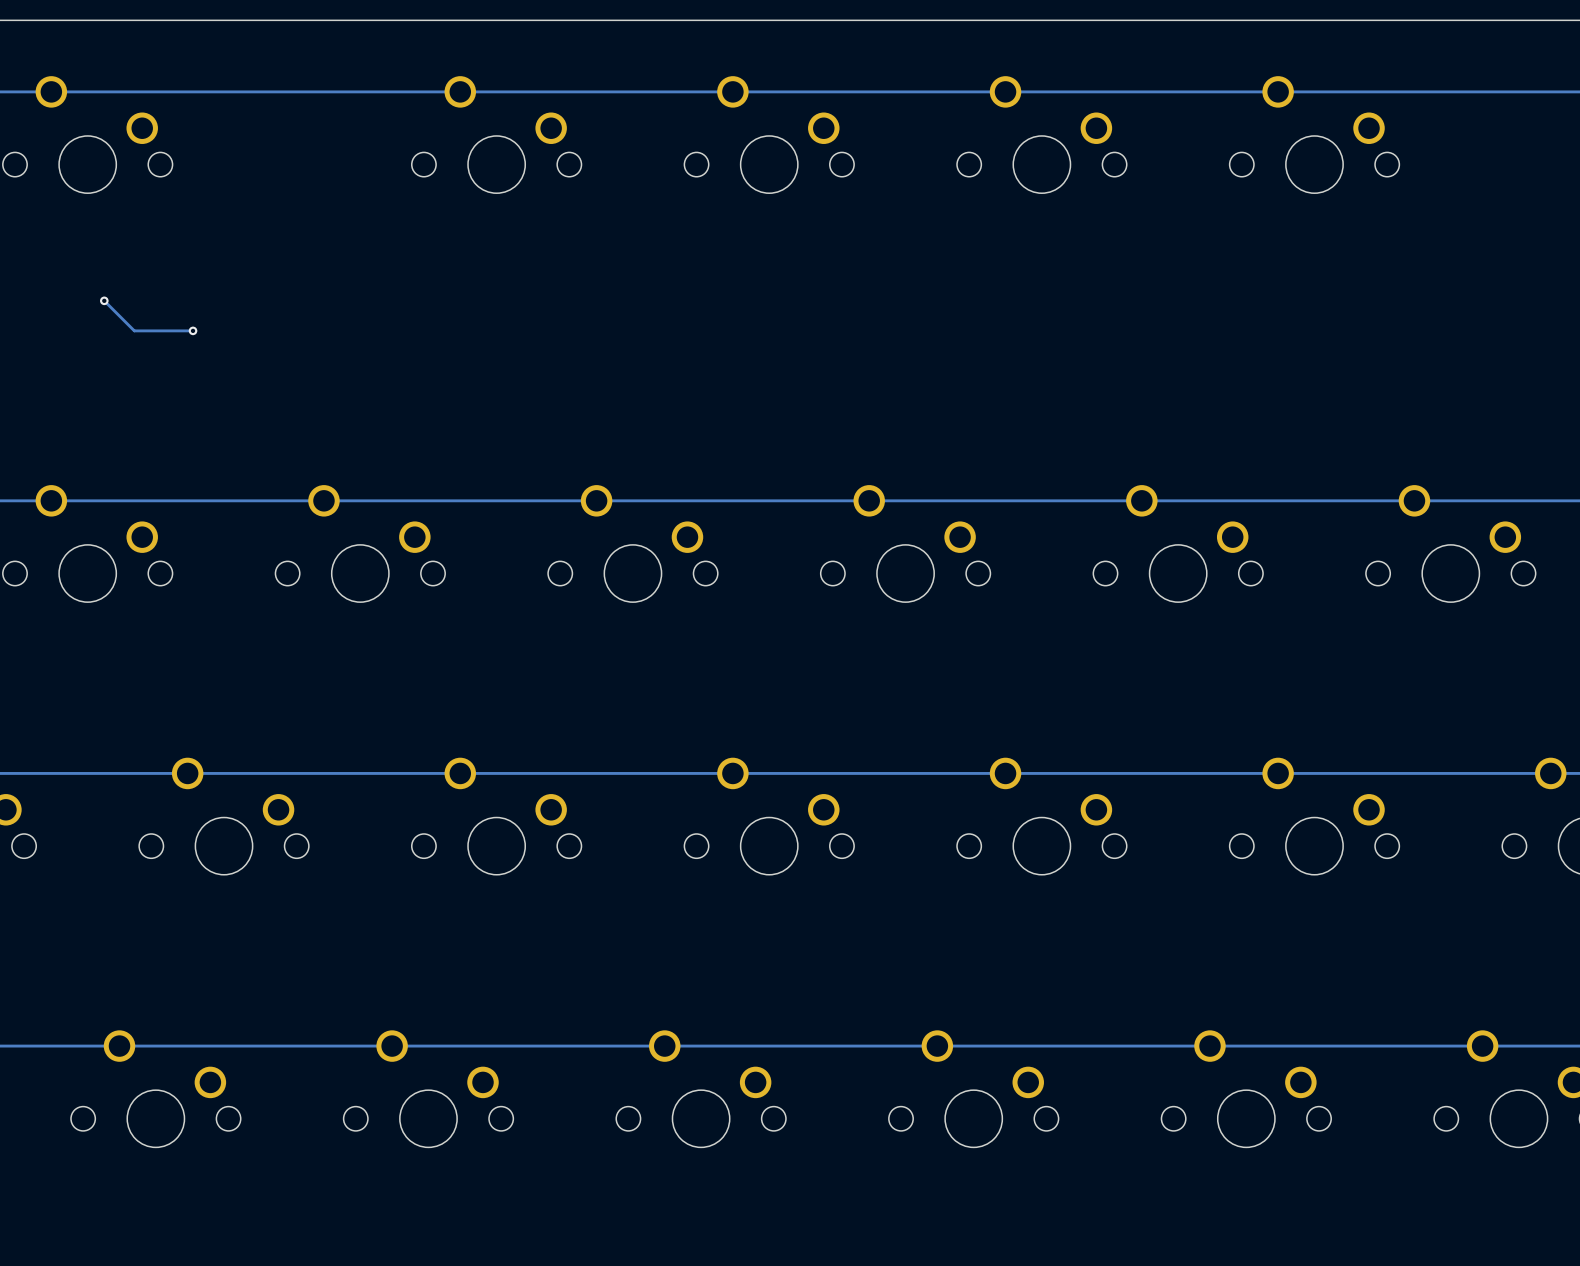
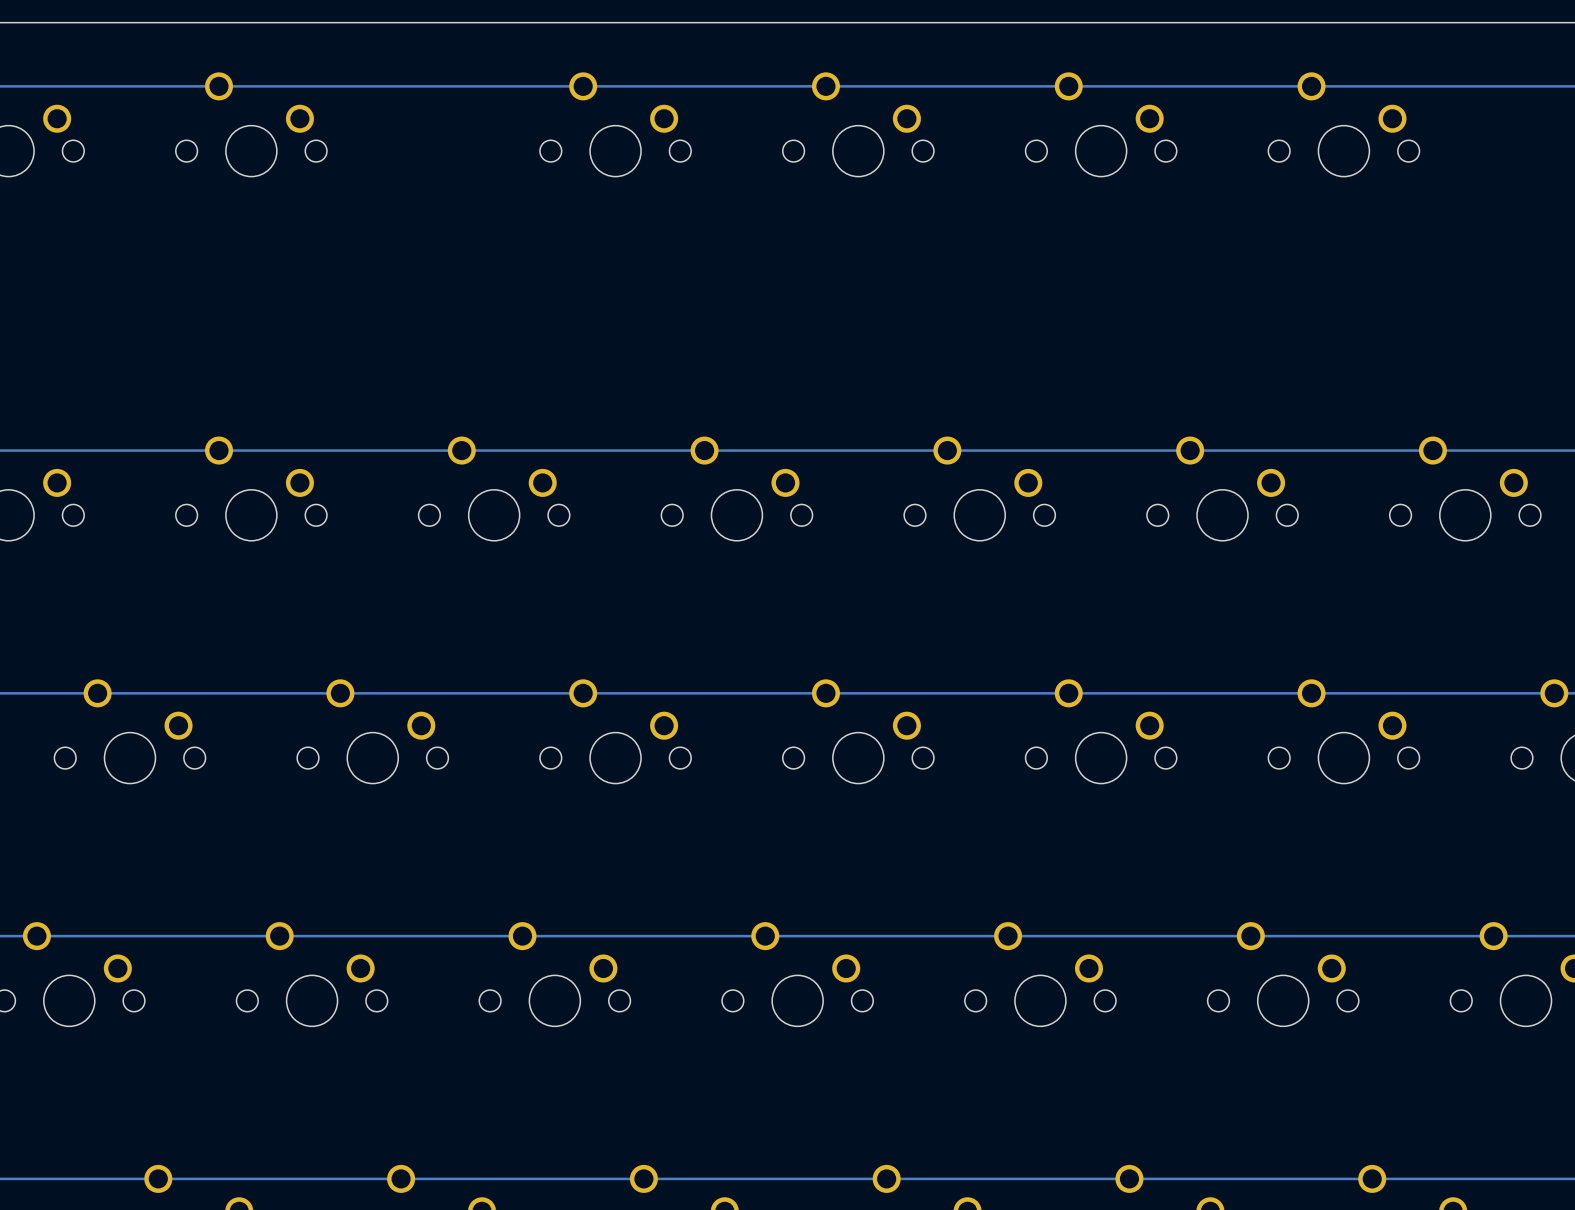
track: (104, 300) (134, 330) (193, 330) -> none
via: (104, 300) -> none
via: (193, 330) -> none

